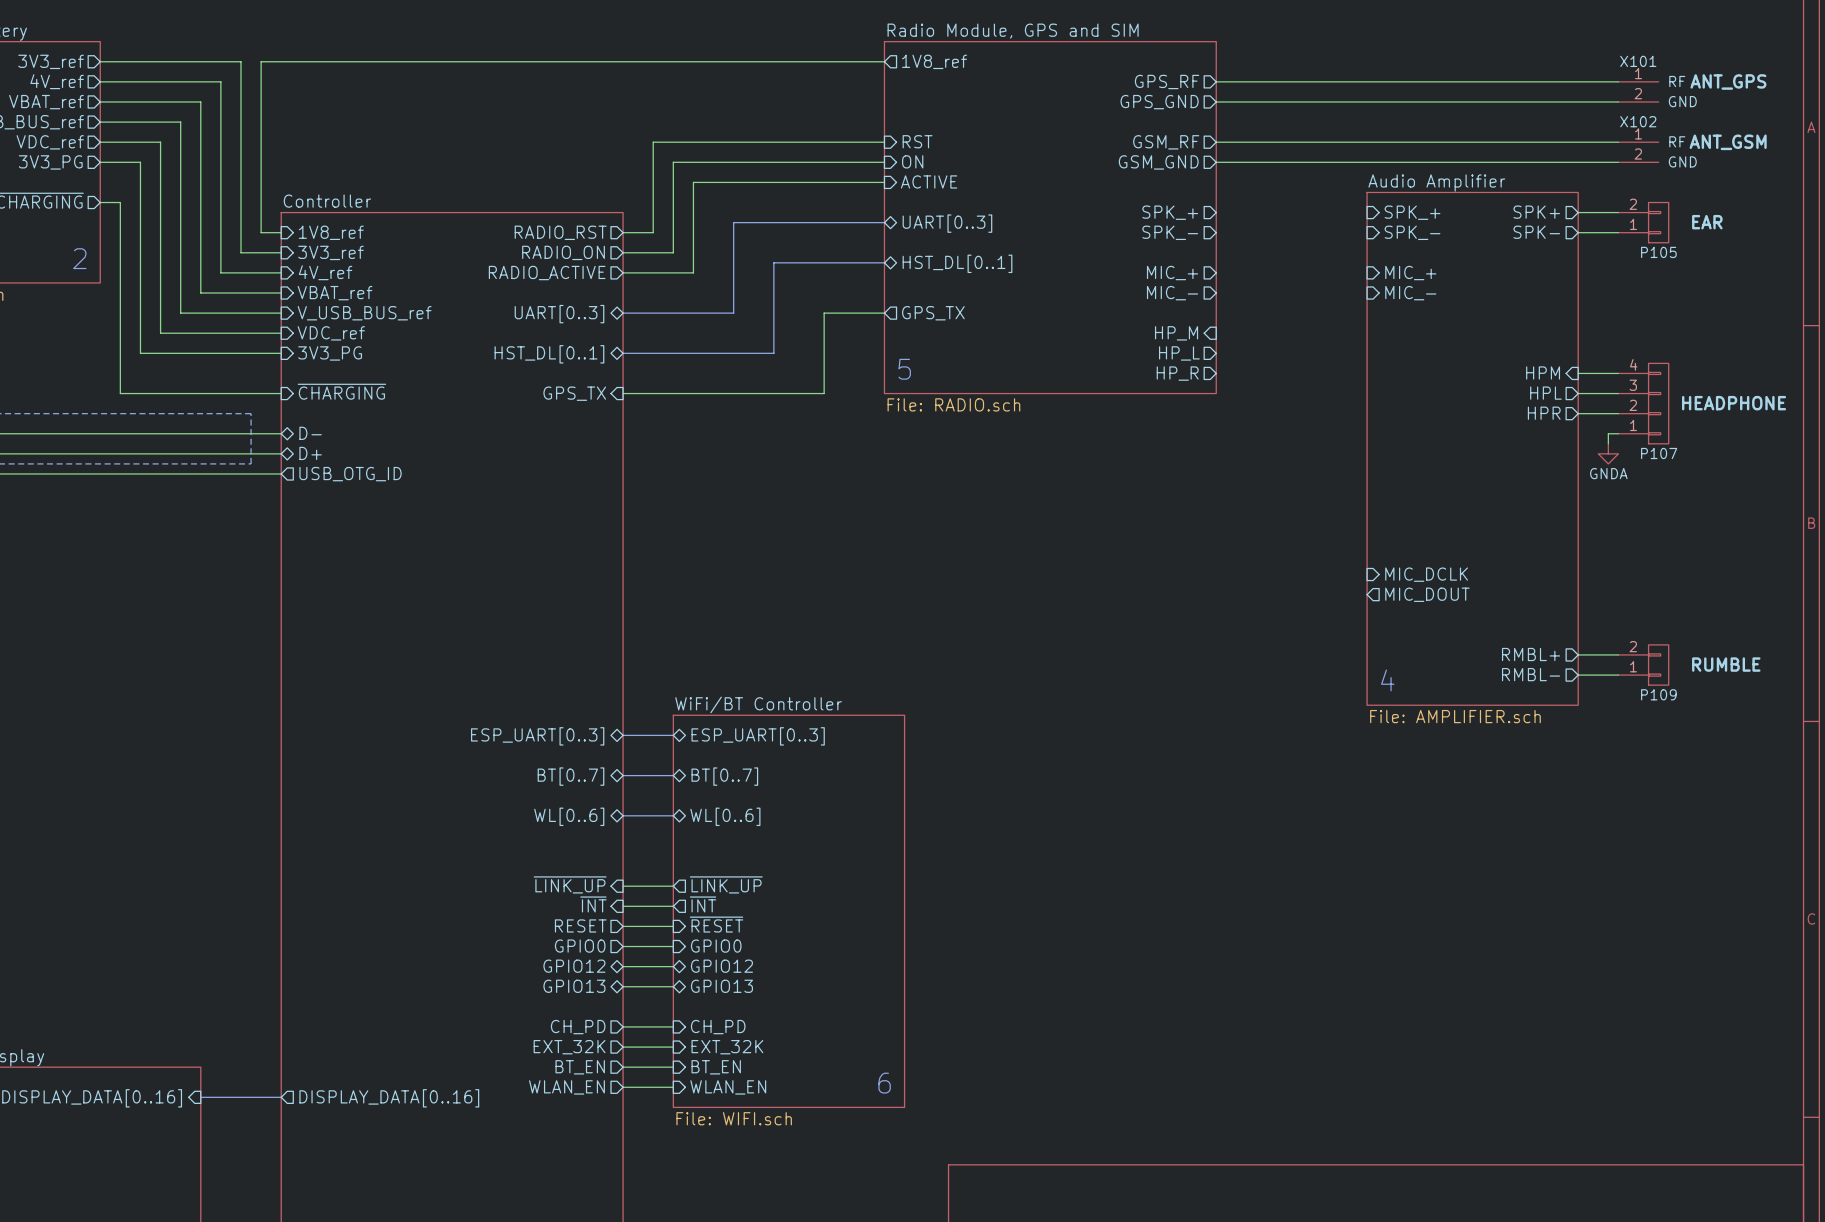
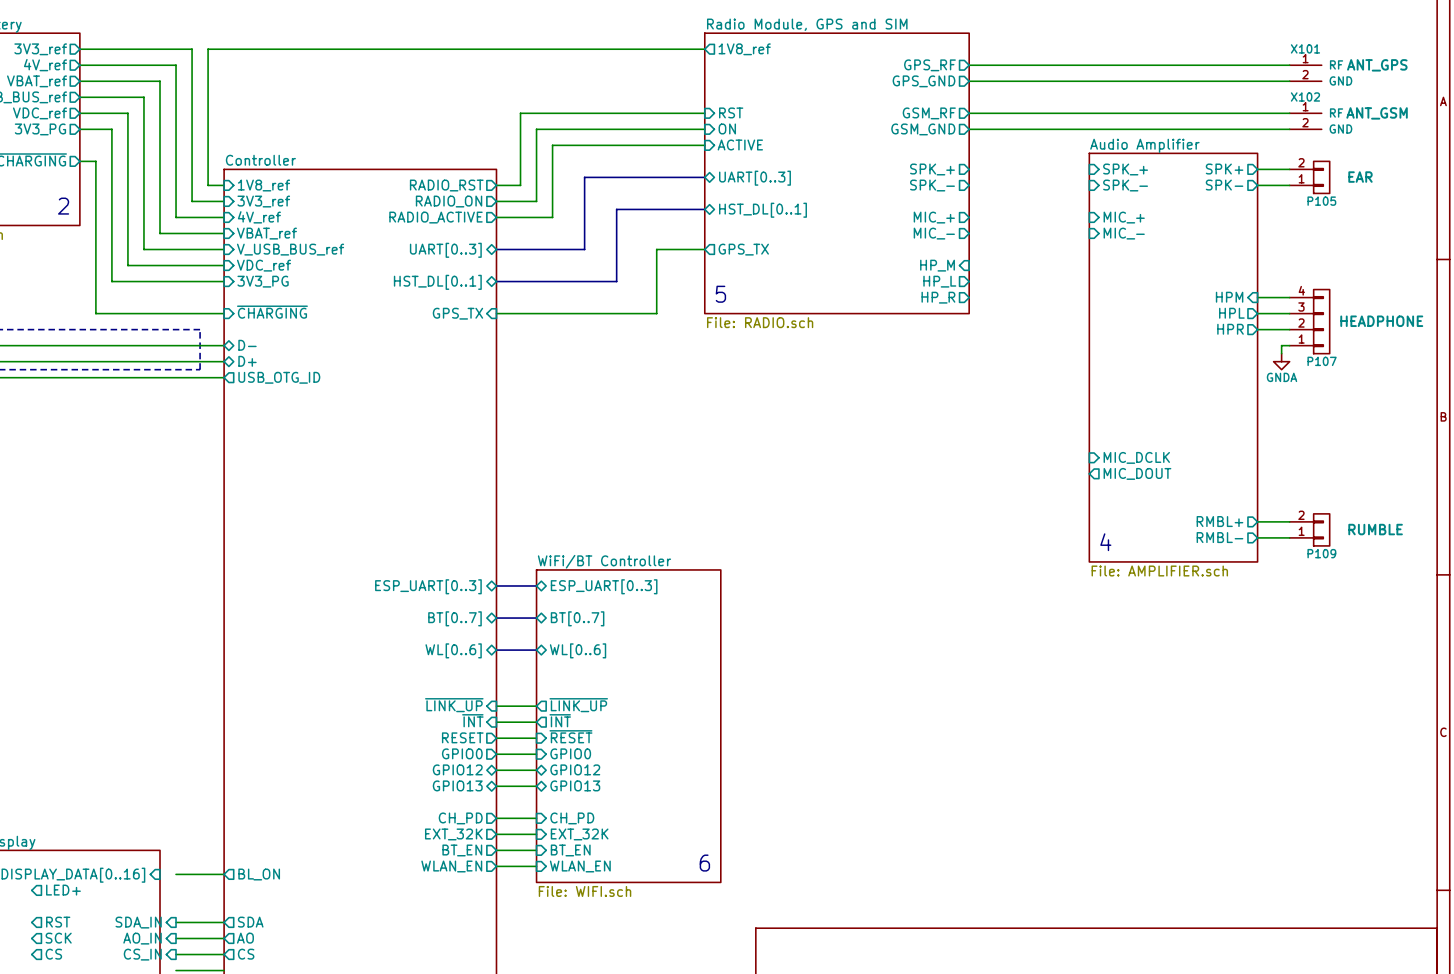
bus: (200, 1097) (281, 1097) -> none
sheet pin: DISPLAY_DATA[0..16] (389, 1098) -> BL_ON (259, 874)
sheet pin: none -> LED+ (63, 890)
sheet pin: none -> RST (58, 922)
sheet pin: none -> SDA_IN (138, 922)
wire: none -> (176, 922) (224, 922)
sheet pin: none -> SDA (250, 922)
sheet pin: none -> SCK (58, 938)
sheet pin: none -> AO_IN (142, 938)
wire: none -> (176, 938) (224, 938)
sheet pin: none -> AO (245, 938)
sheet pin: none -> CS (53, 954)
wire: none -> (176, 954) (224, 954)
sheet pin: none -> CS (246, 954)
sheet pin: none -> CS_IN (142, 954)
wire: none -> (176, 970) (224, 970)

